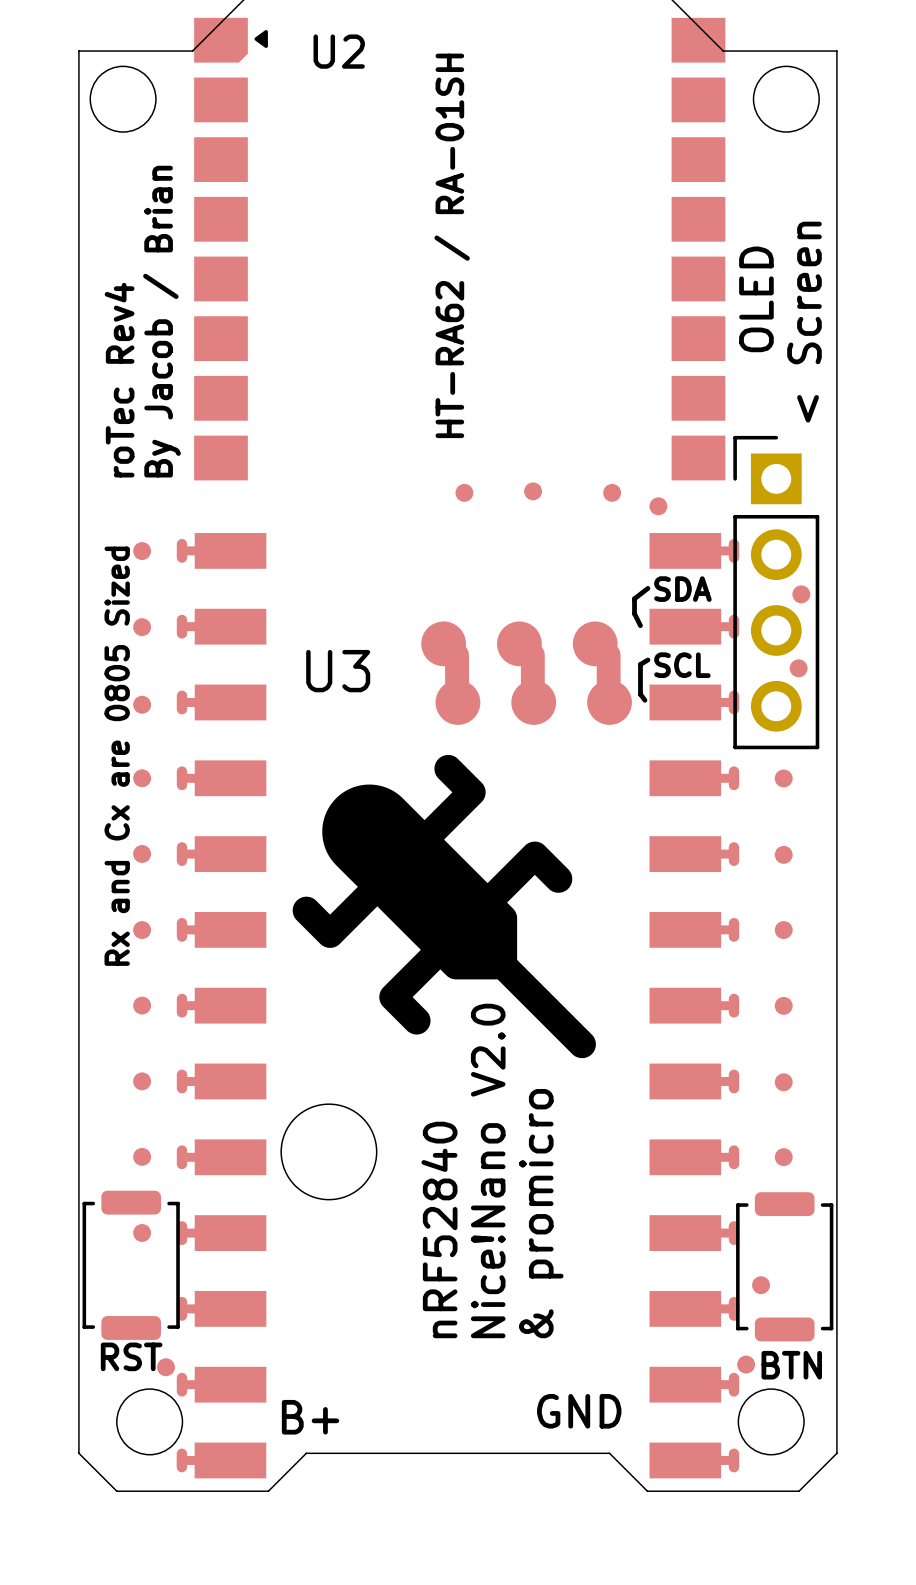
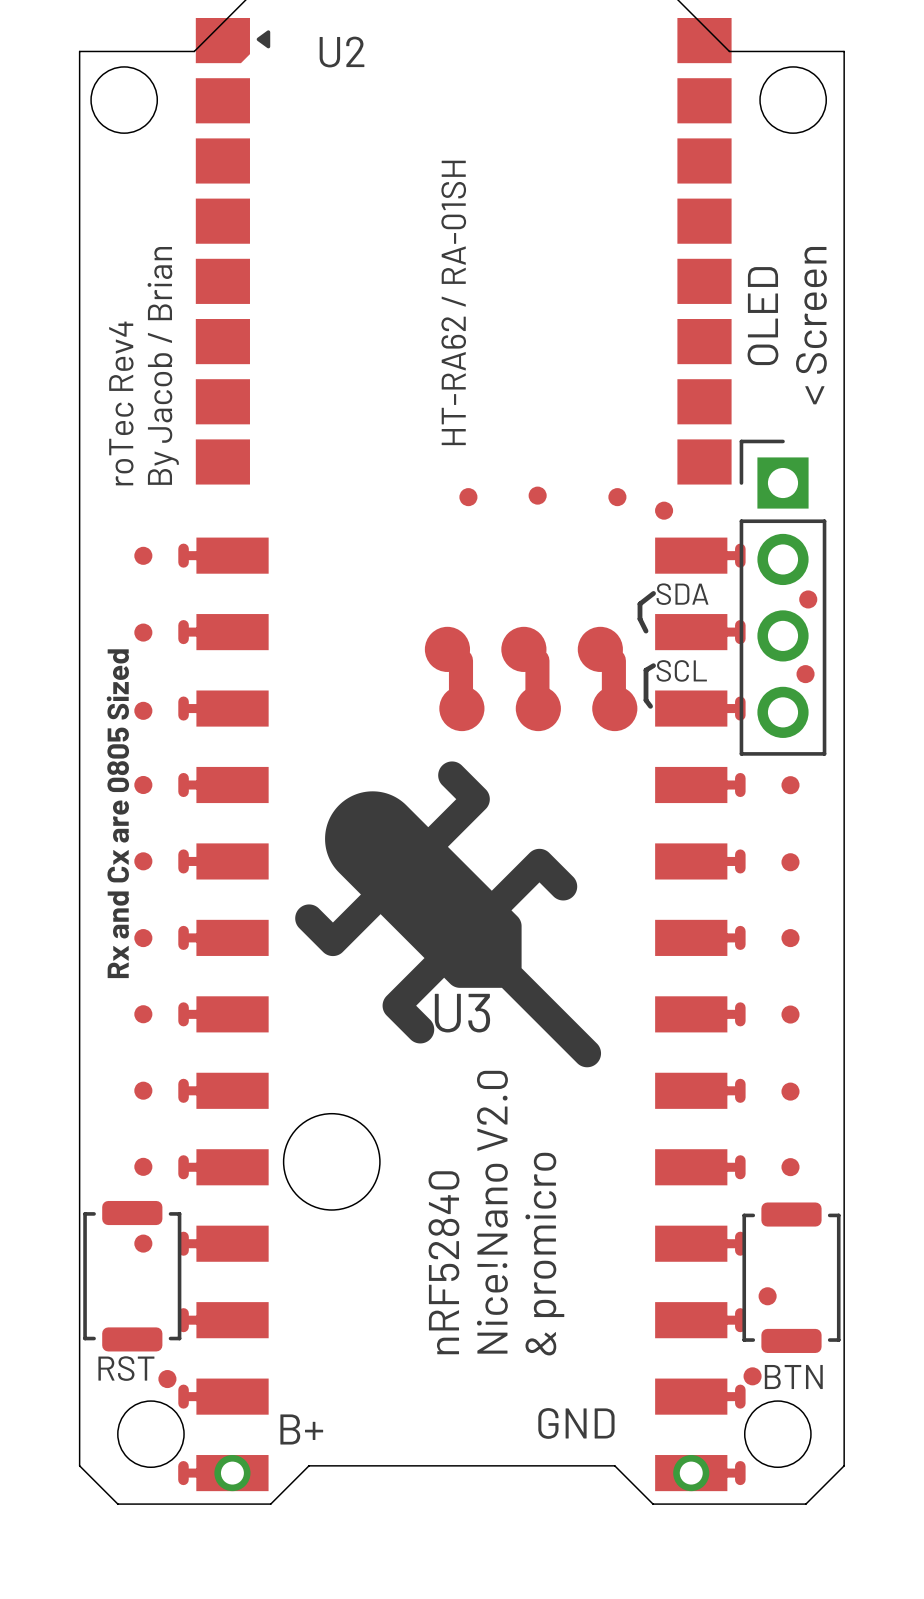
U3 footprint: [176, 532, 740, 1479] -> [178, 537, 746, 1492]
U3 name position: U3 (338, 671) -> U3 (462, 1013)

